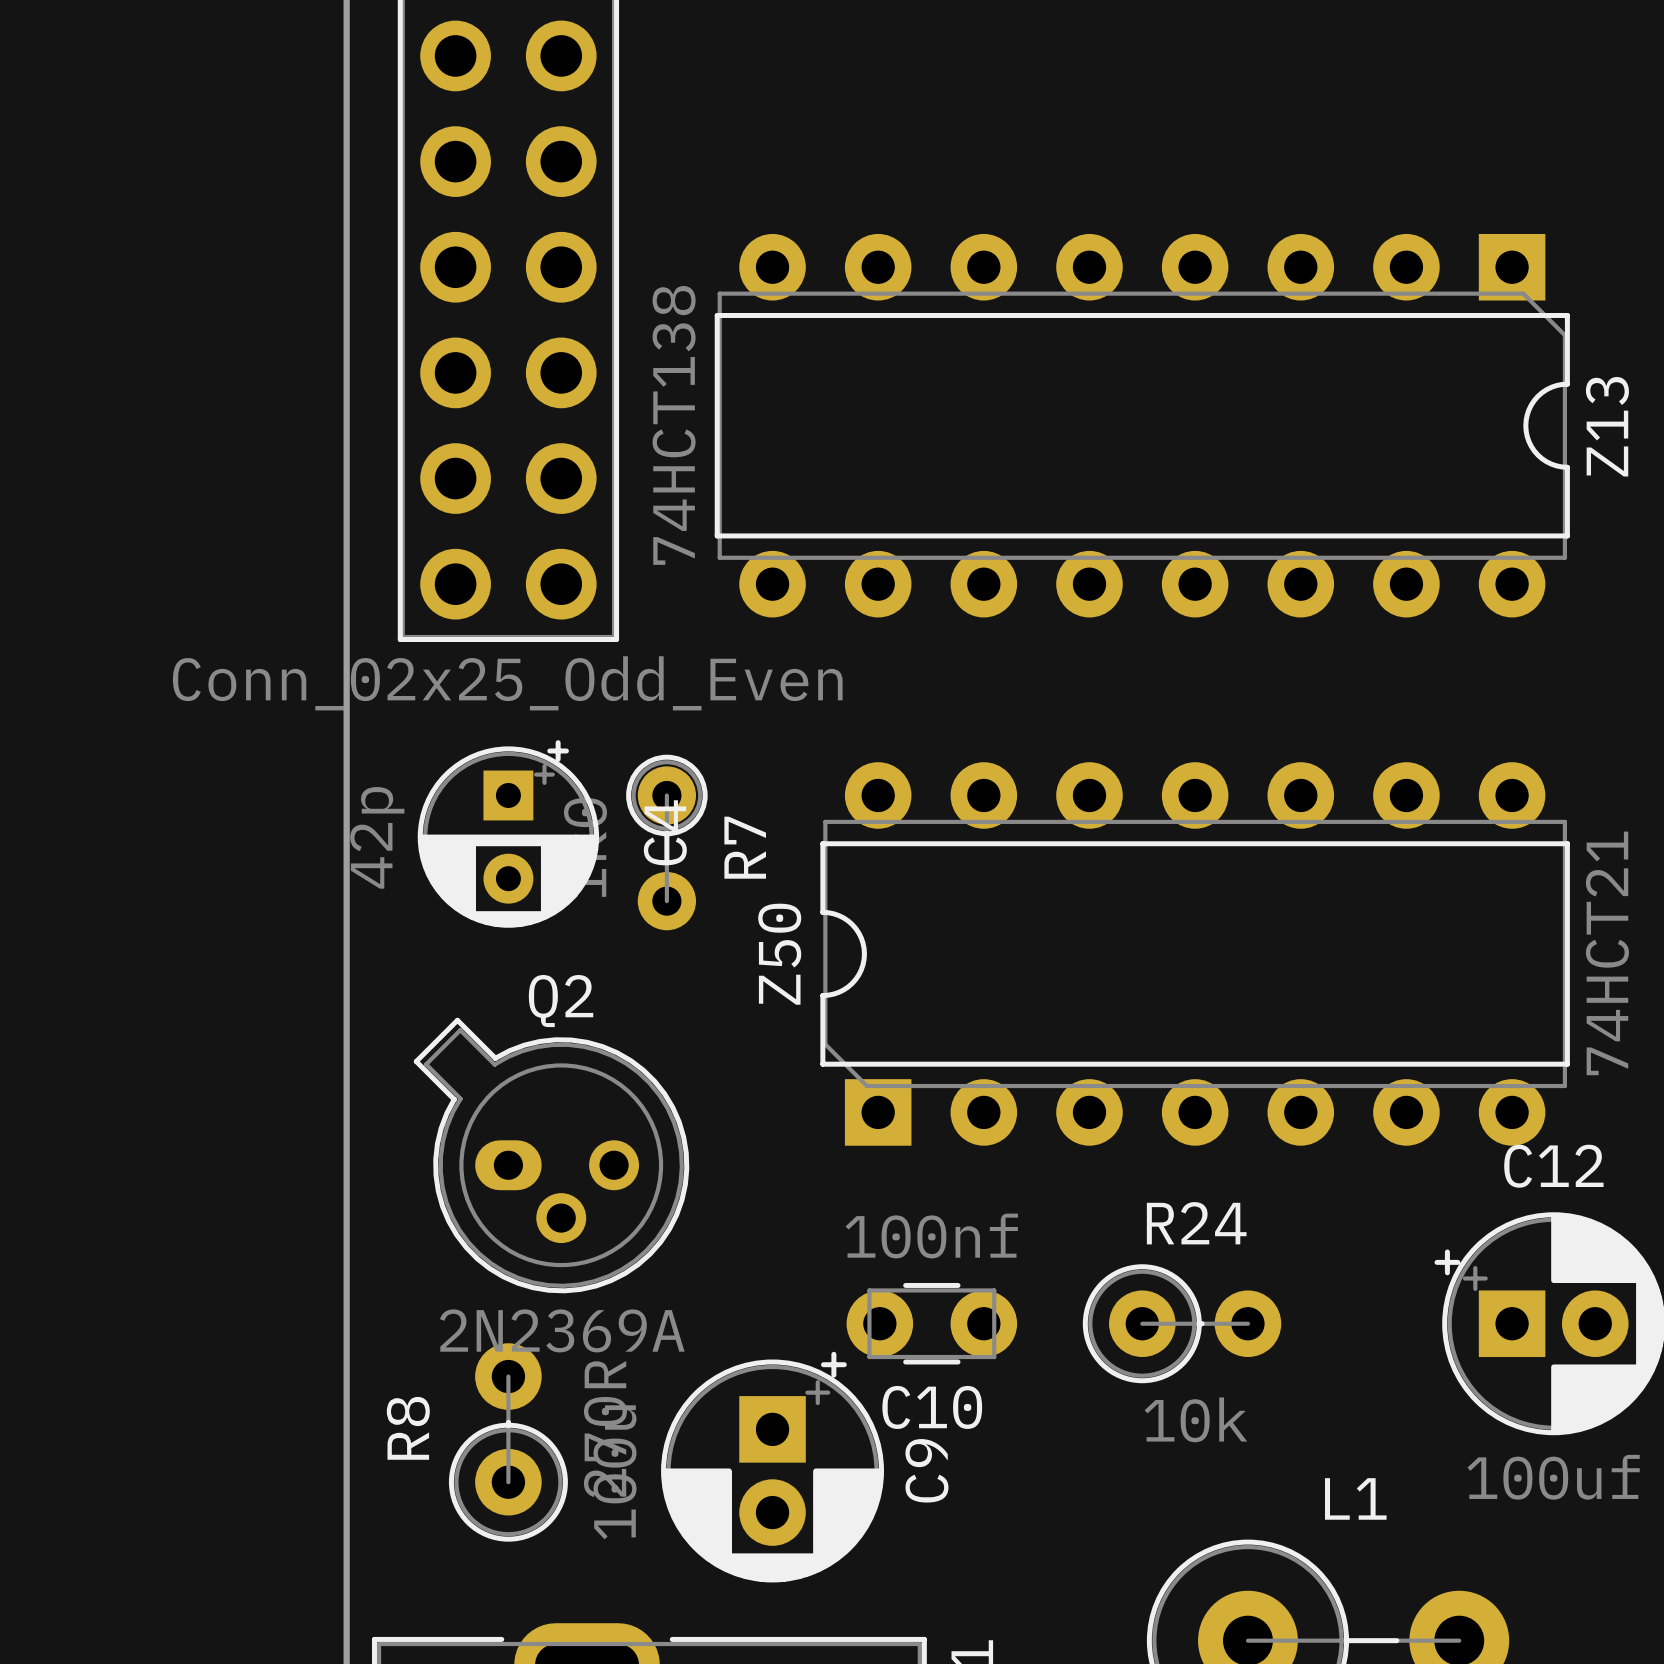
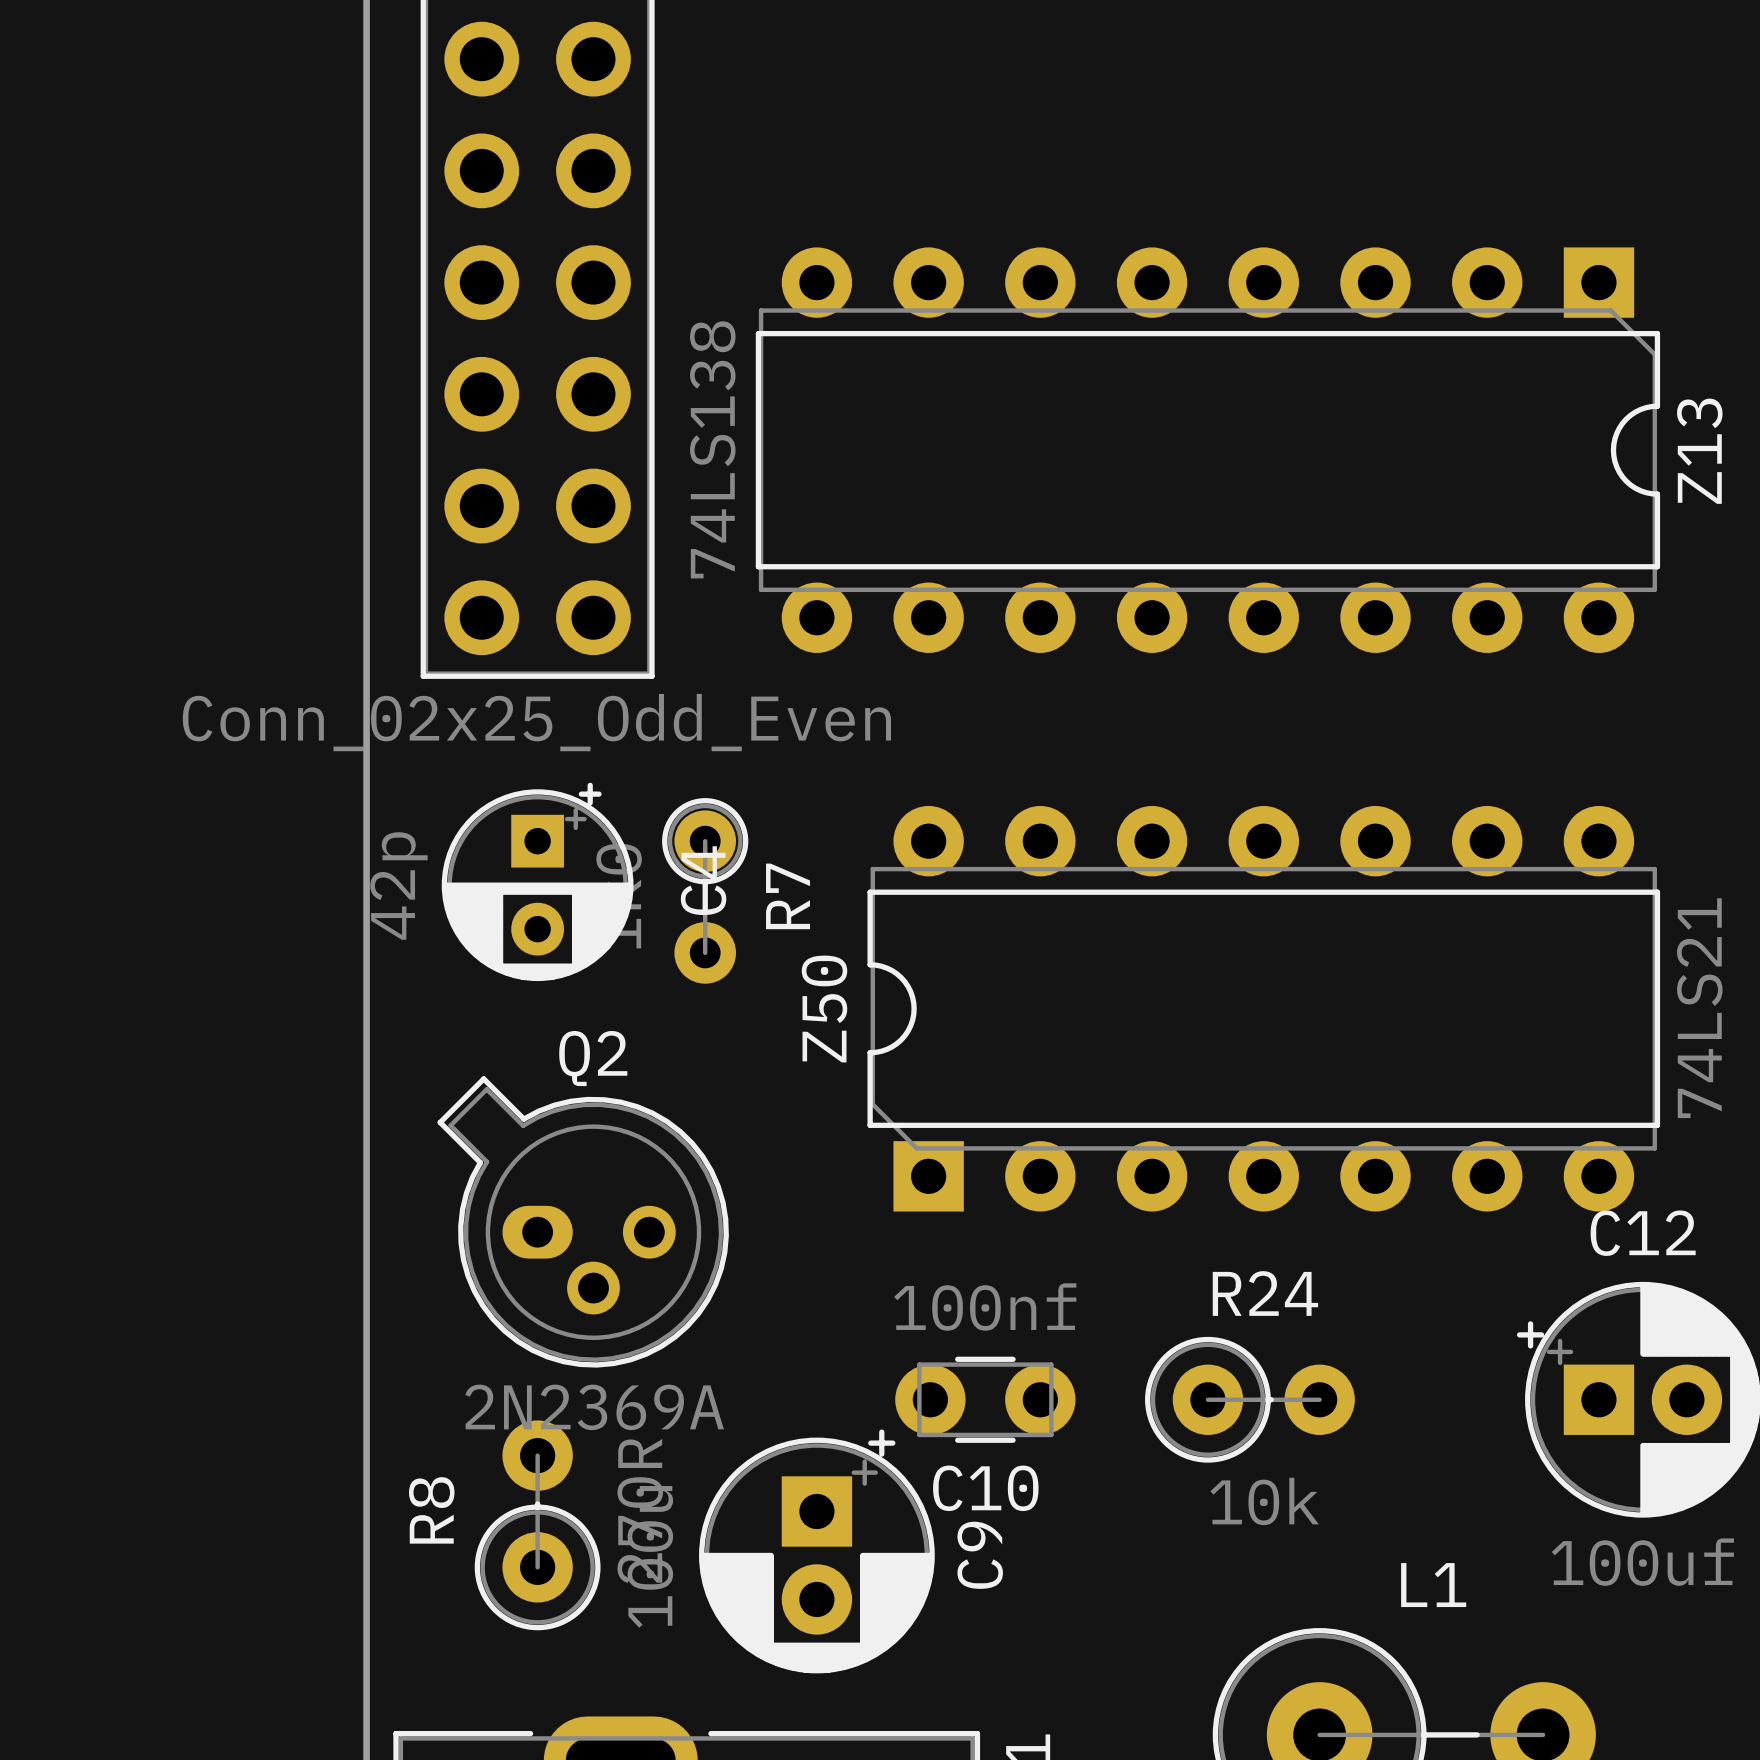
Z13 value: 74HCT138 (674, 425) -> 74LS138 (712, 449)
Z50 value: 74HCT21 (1607, 953) -> 74LS21 (1699, 1008)

